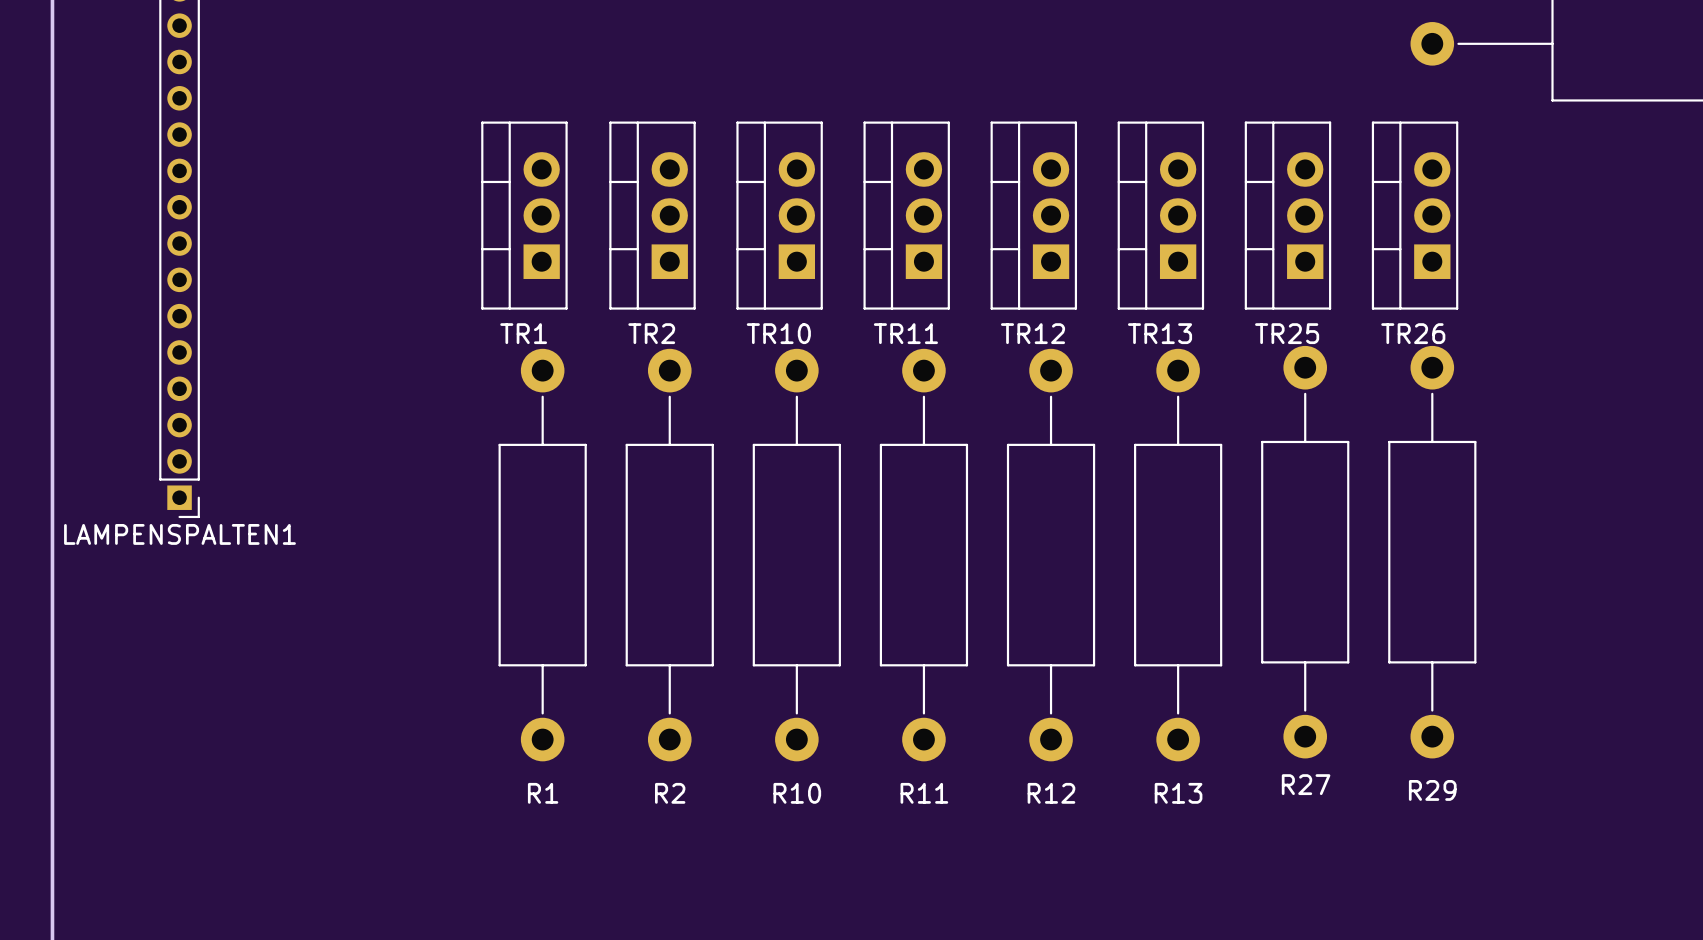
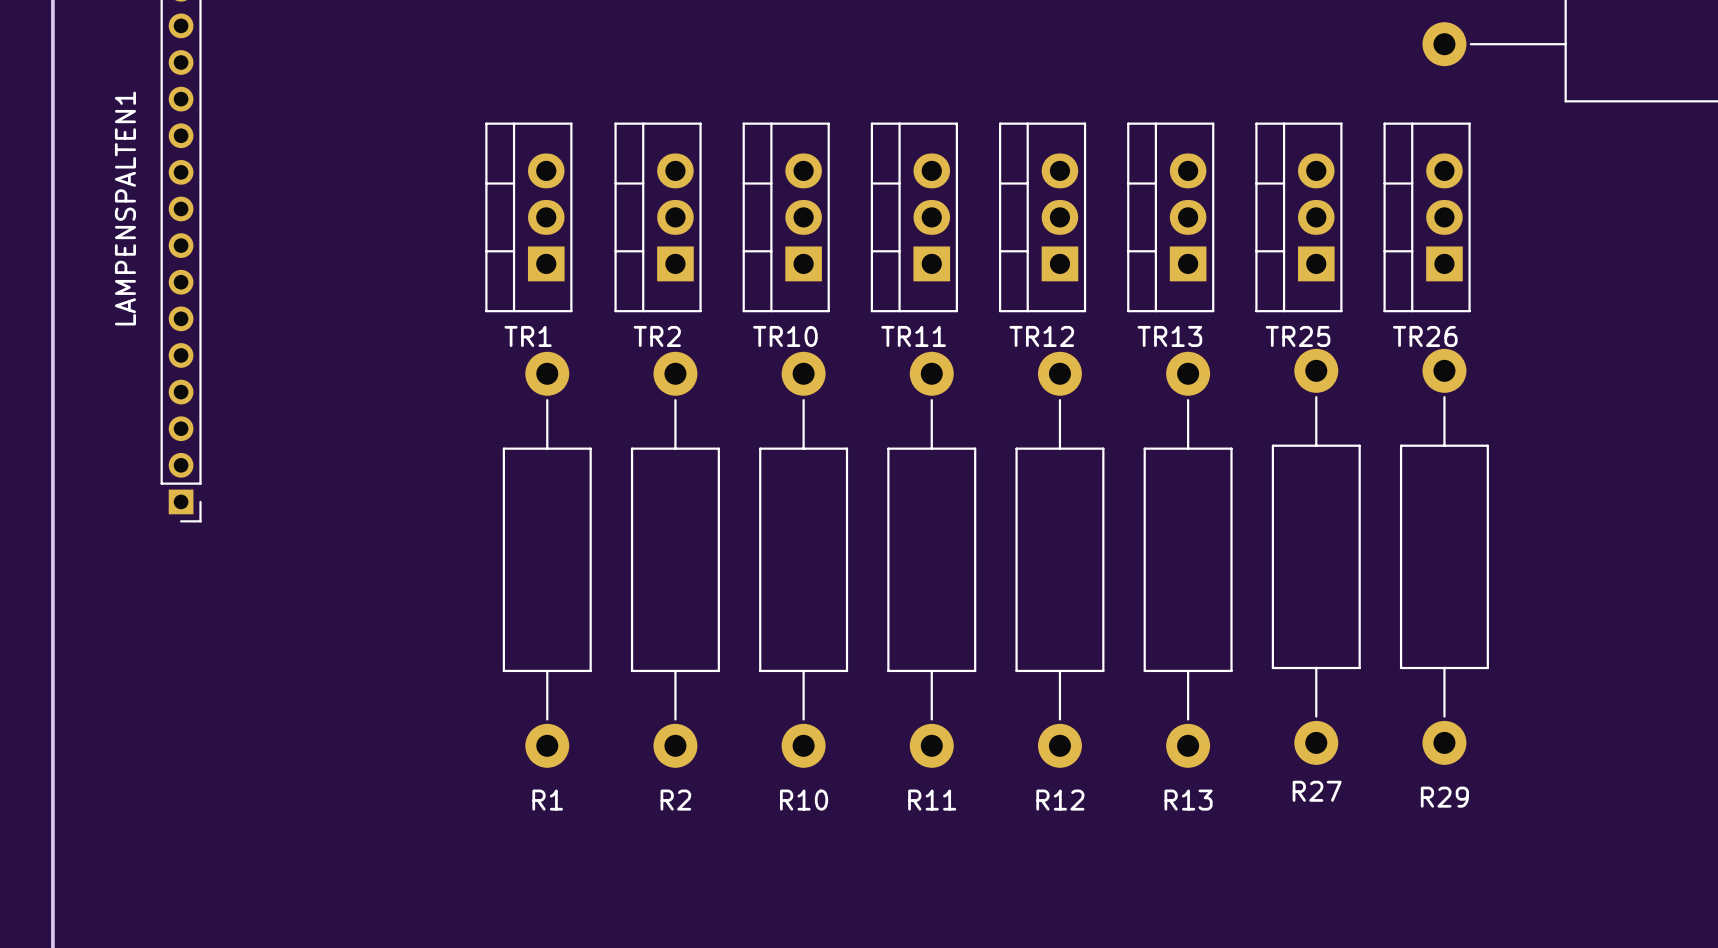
LAMPENSPALTEN1 name rotation: 0° (179, 534) -> 90° counterclockwise (125, 208)
LAMPENSPALTEN1 name position: LAMPENSPALTEN1 (179, 534) -> LAMPENSPALTEN1 (125, 208)

